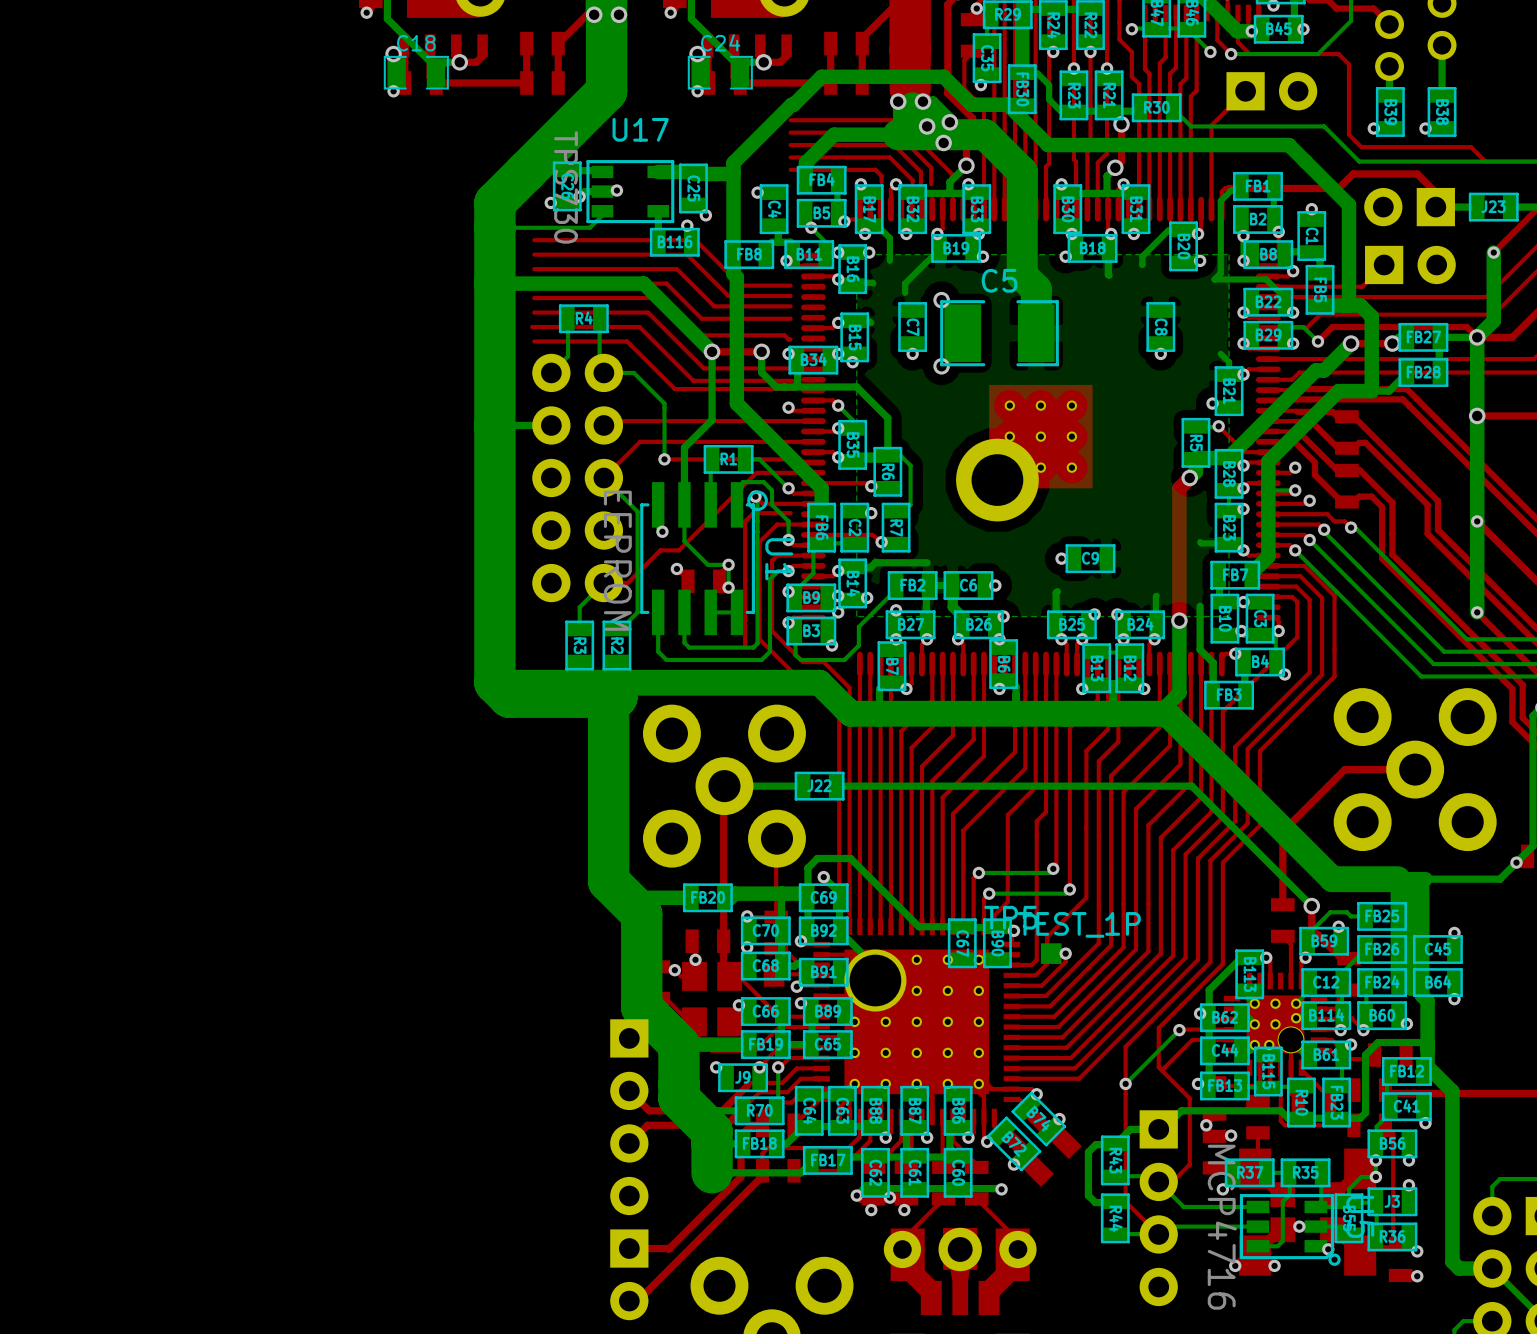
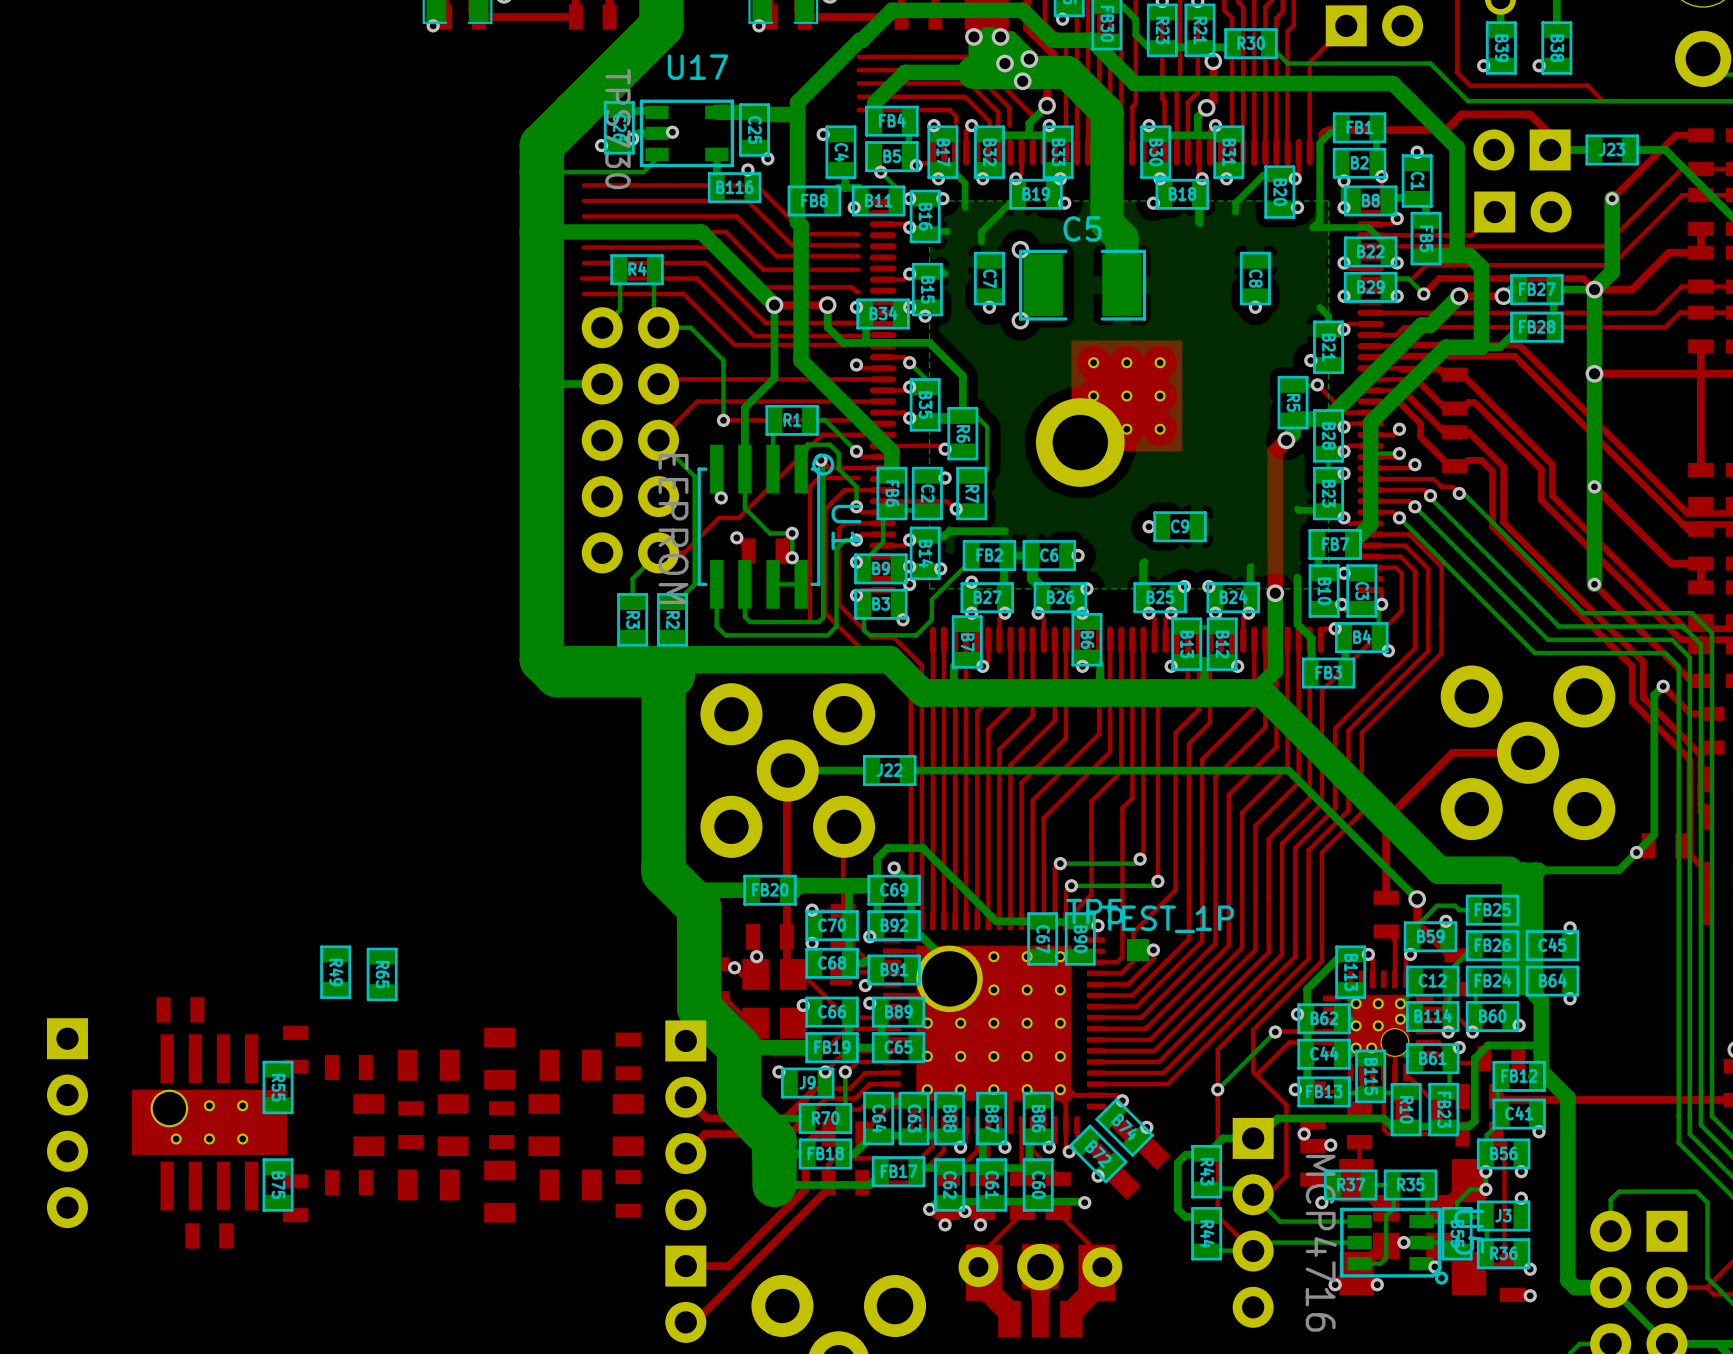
R49: none -> (335, 972)
R65: none -> (382, 974)
part: none -> (180, 1009)
part: none -> (295, 1049)
part: none -> (628, 1056)
part: none -> (499, 1058)
part: none -> (428, 1065)
part: none -> (570, 1065)
part: none -> (348, 1067)
R55: none -> (278, 1087)
part: none -> (209, 1122)
part: none -> (67, 1123)
part: none -> (368, 1125)
part: none -> (410, 1125)
part: none -> (453, 1125)
part: none -> (501, 1125)
part: none -> (543, 1125)
part: none -> (628, 1125)
part: none -> (348, 1182)
B75: none -> (278, 1184)
part: none -> (428, 1184)
part: none -> (570, 1184)
part: none -> (499, 1191)
part: none -> (628, 1193)
part: none -> (295, 1198)
part: none -> (209, 1235)

